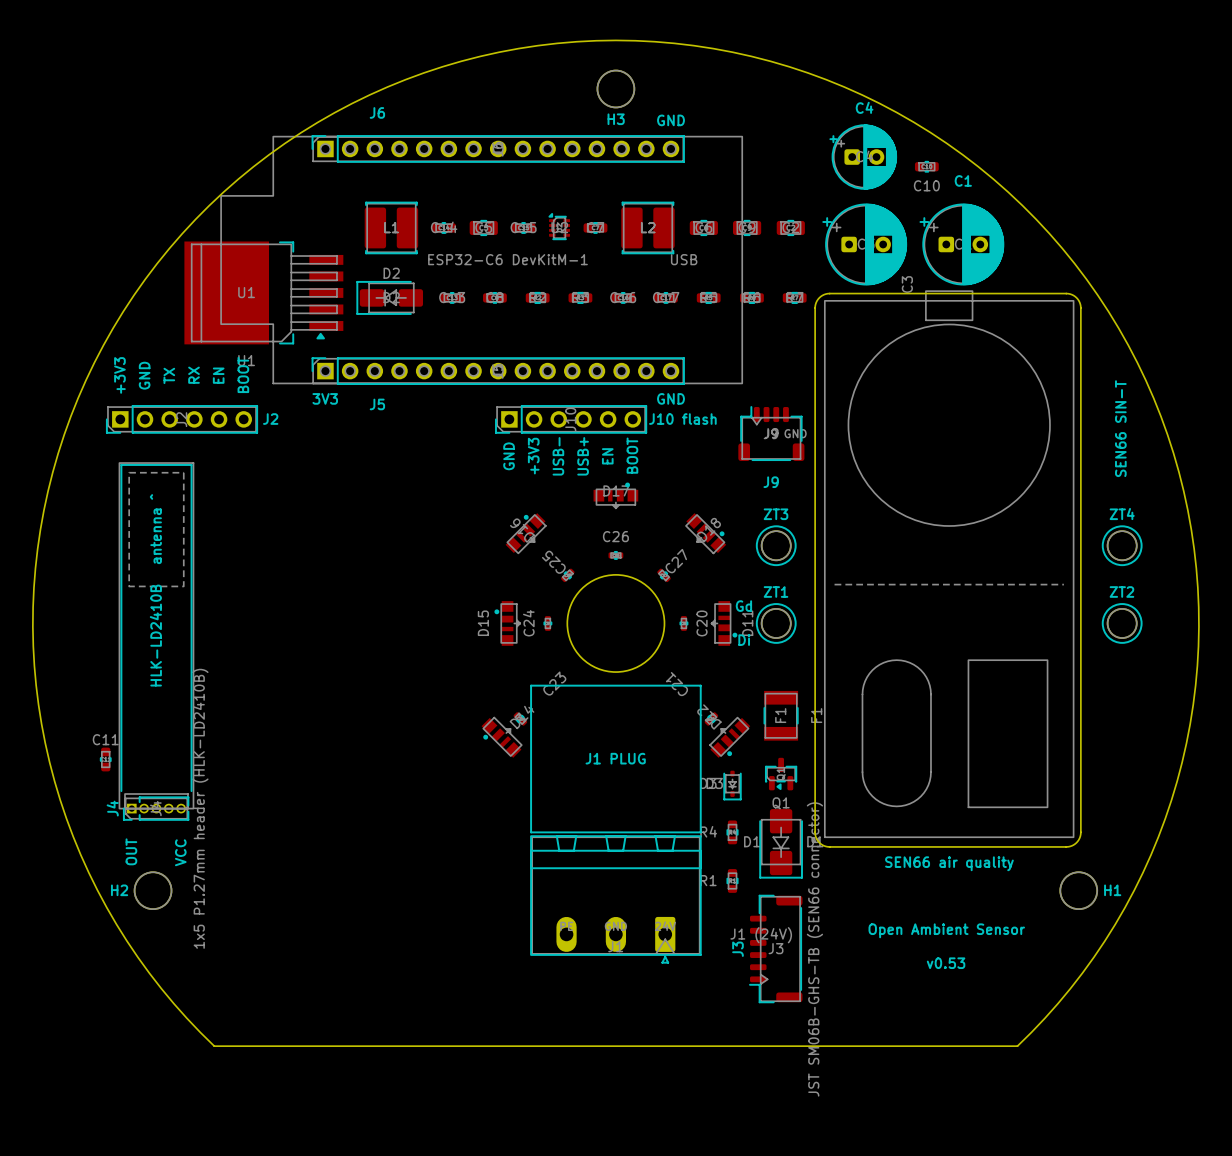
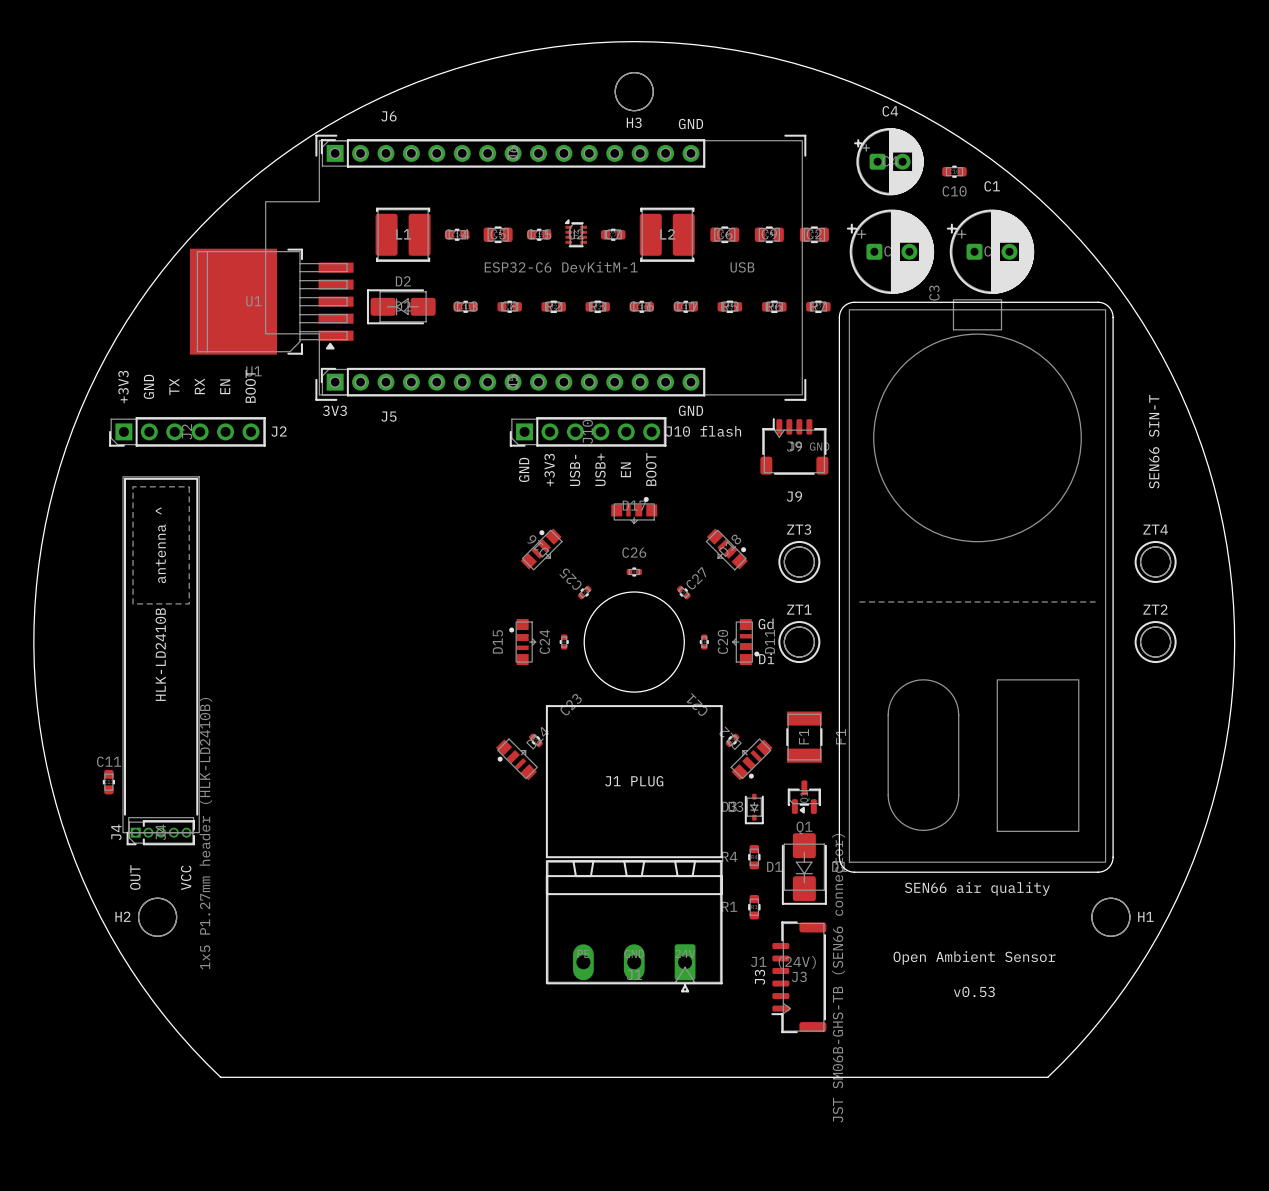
drawing: none -> [265, 134, 807, 401]
drawing: [220, 136, 743, 384] -> none
text position: ESP32-C6 DevKitM-1 (507, 259) -> ESP32-C6 DevKitM-1 (561, 267)
text position: USB (684, 259) -> USB (742, 267)

